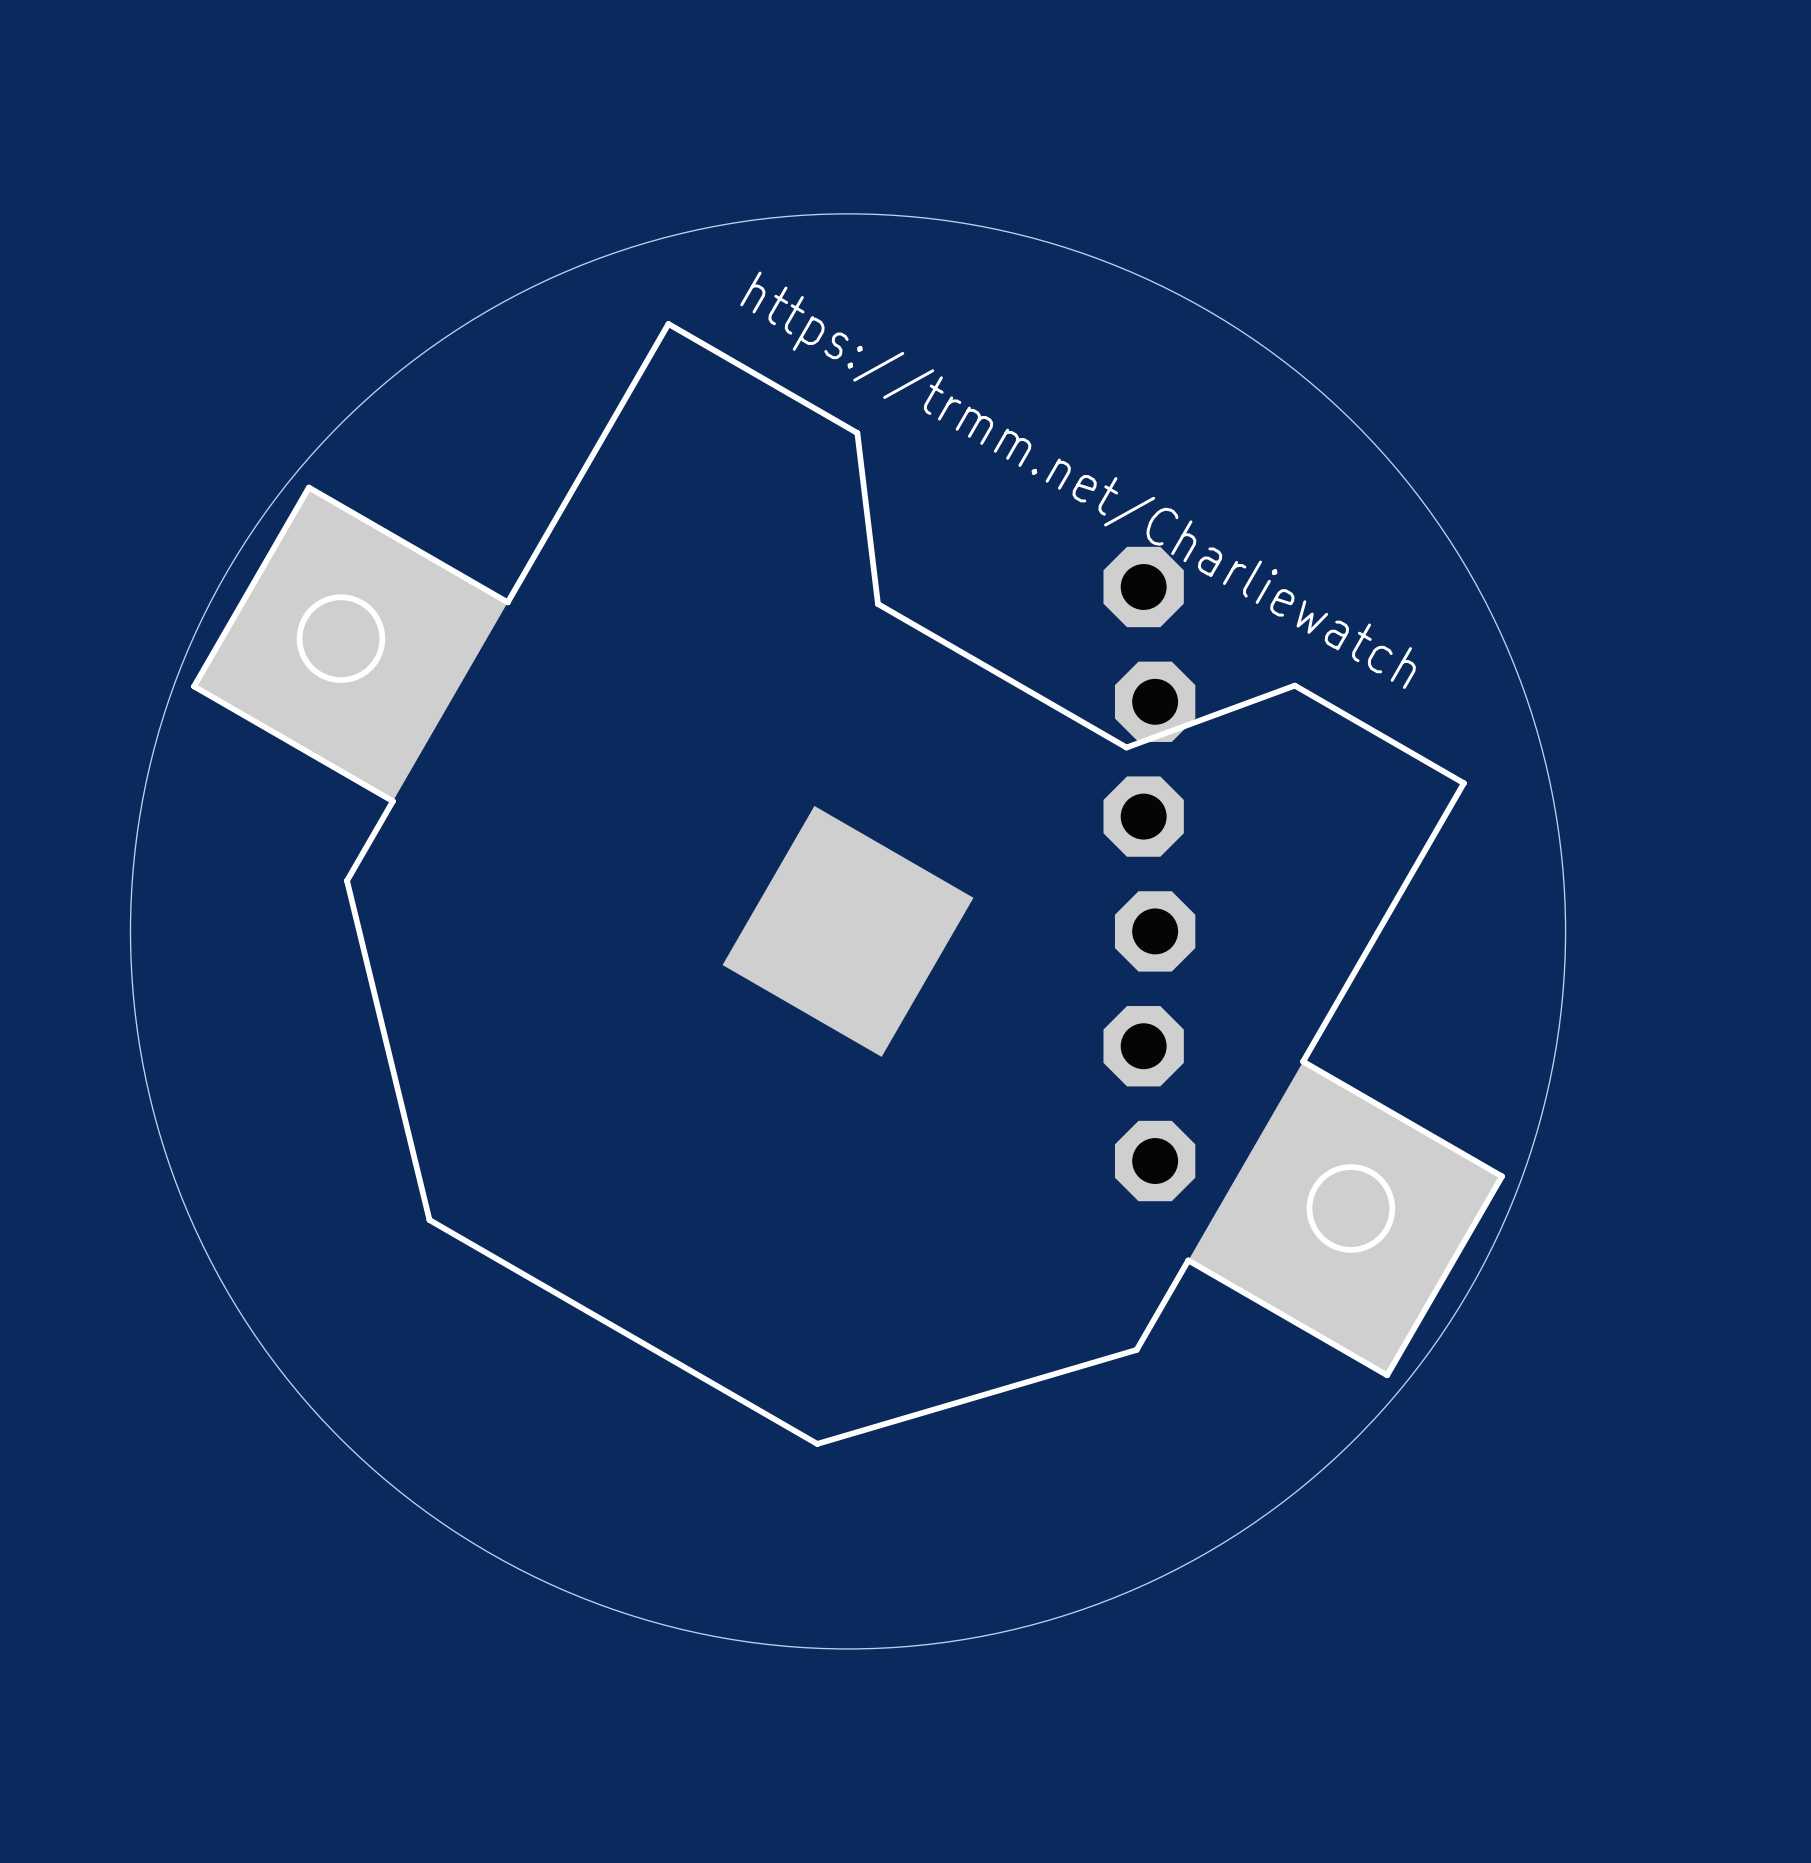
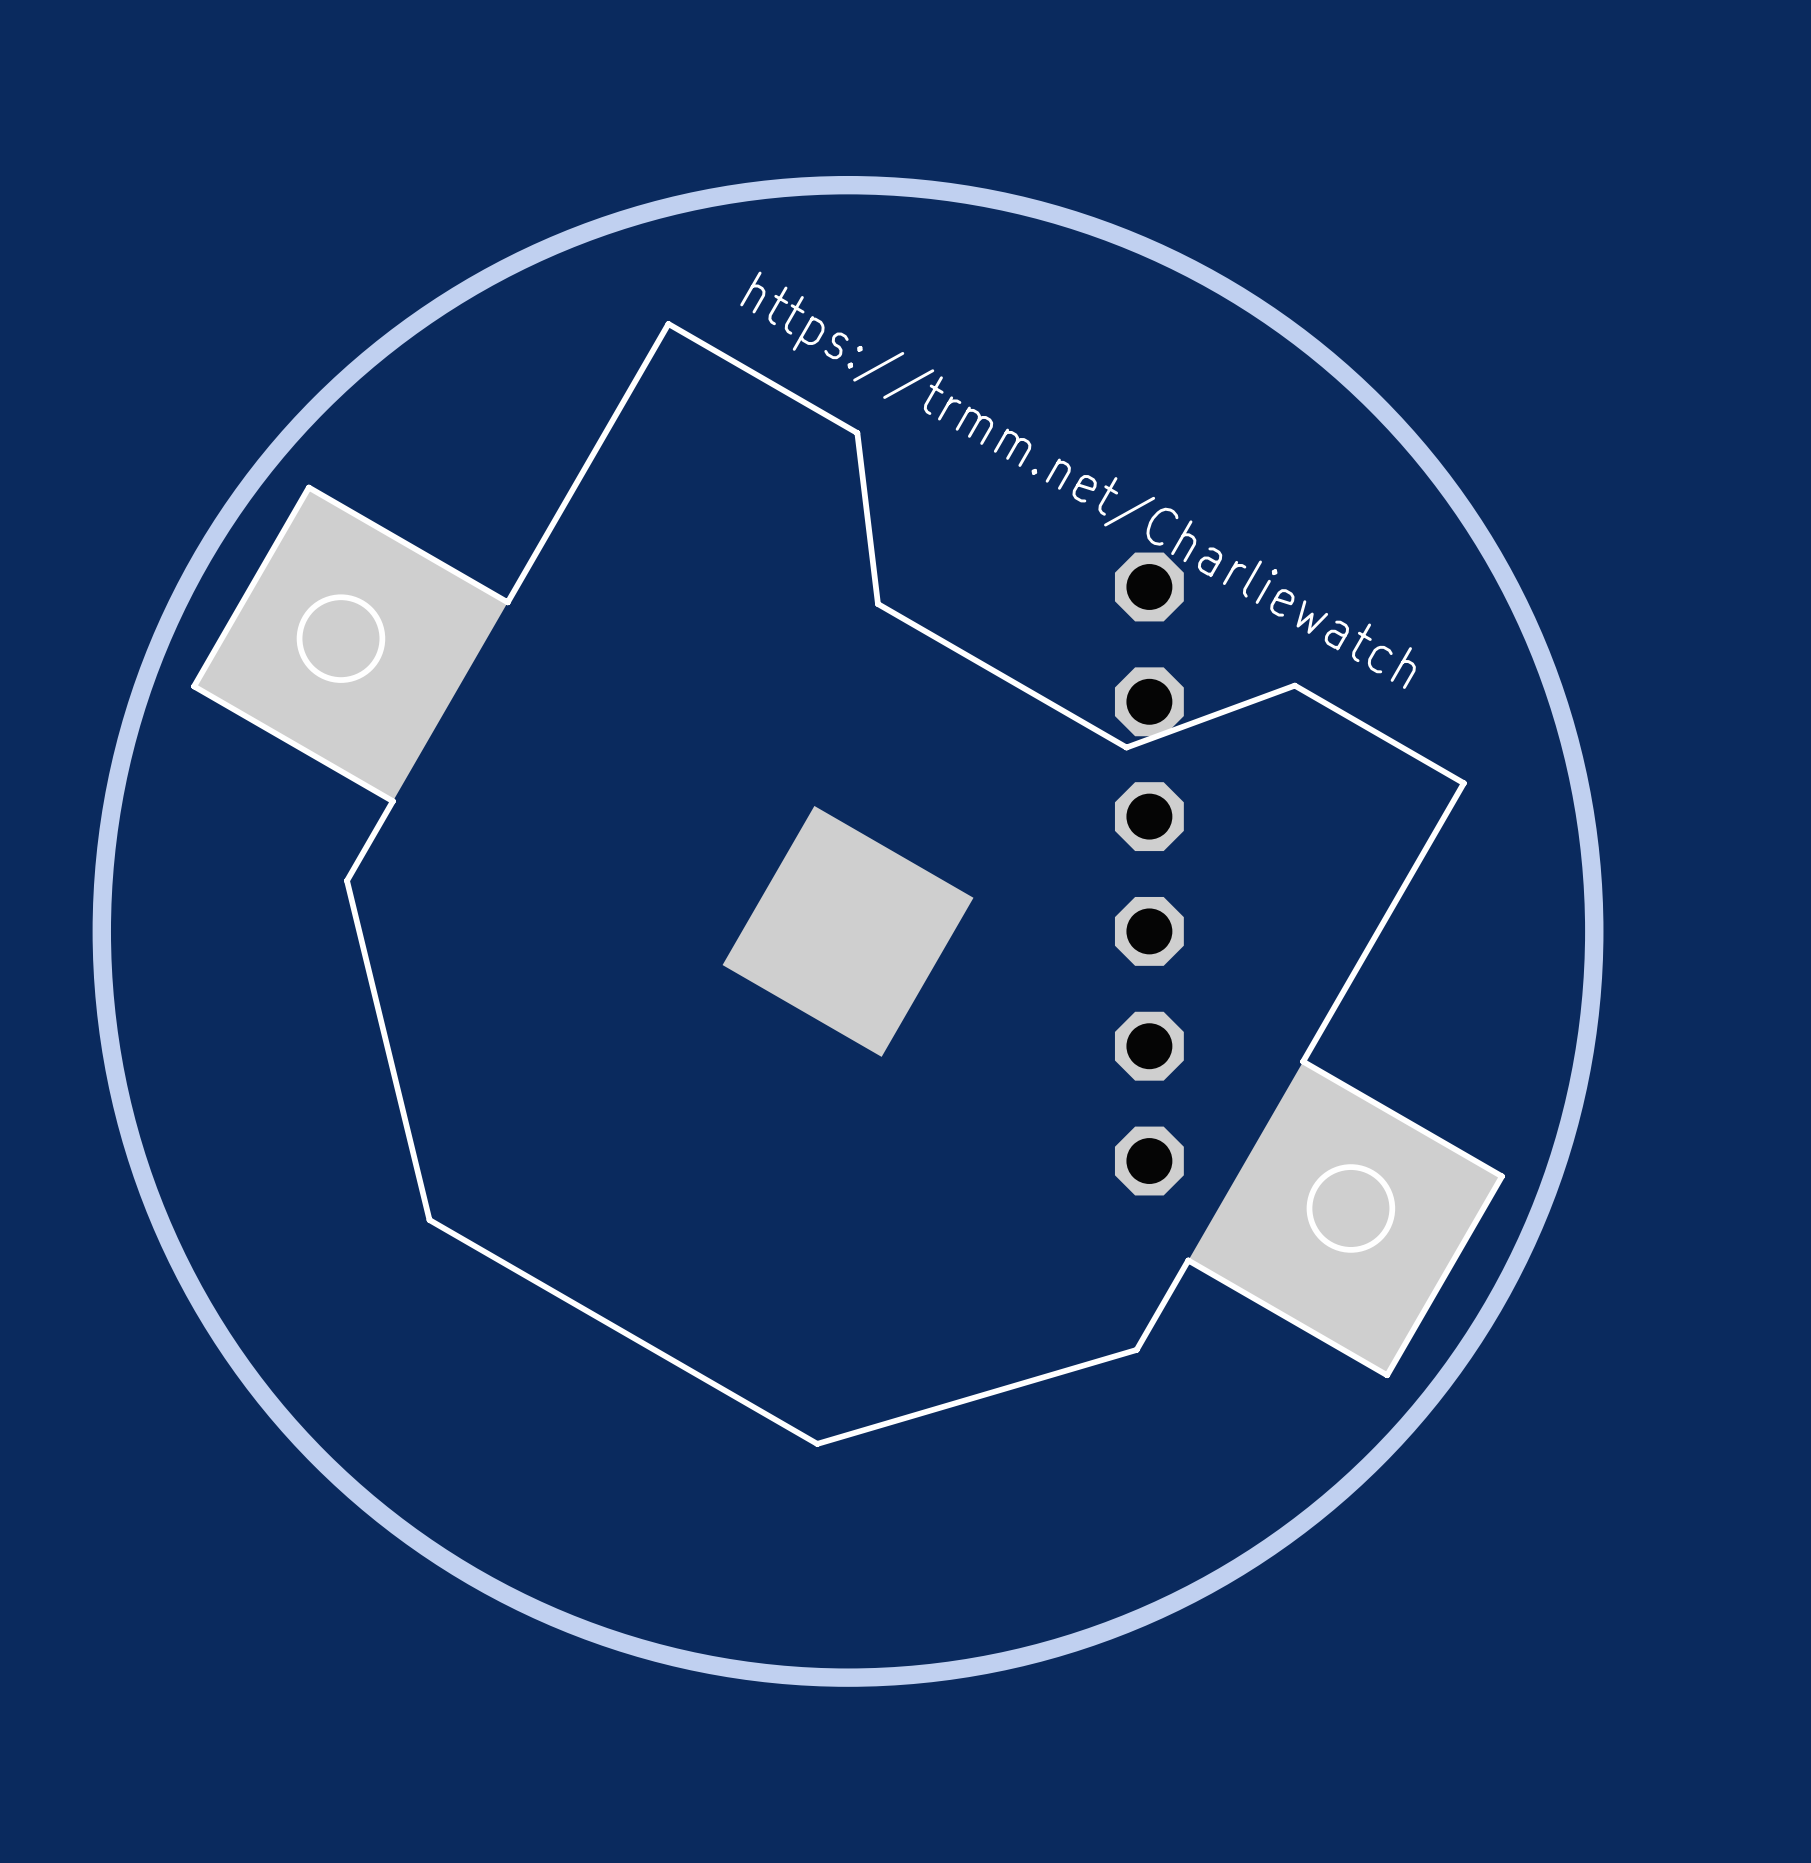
round board edge size: [129, 213, 1567, 1650] -> [92, 175, 1604, 1687]
part footprint: [1103, 546, 1196, 1202] -> [1114, 552, 1184, 1196]

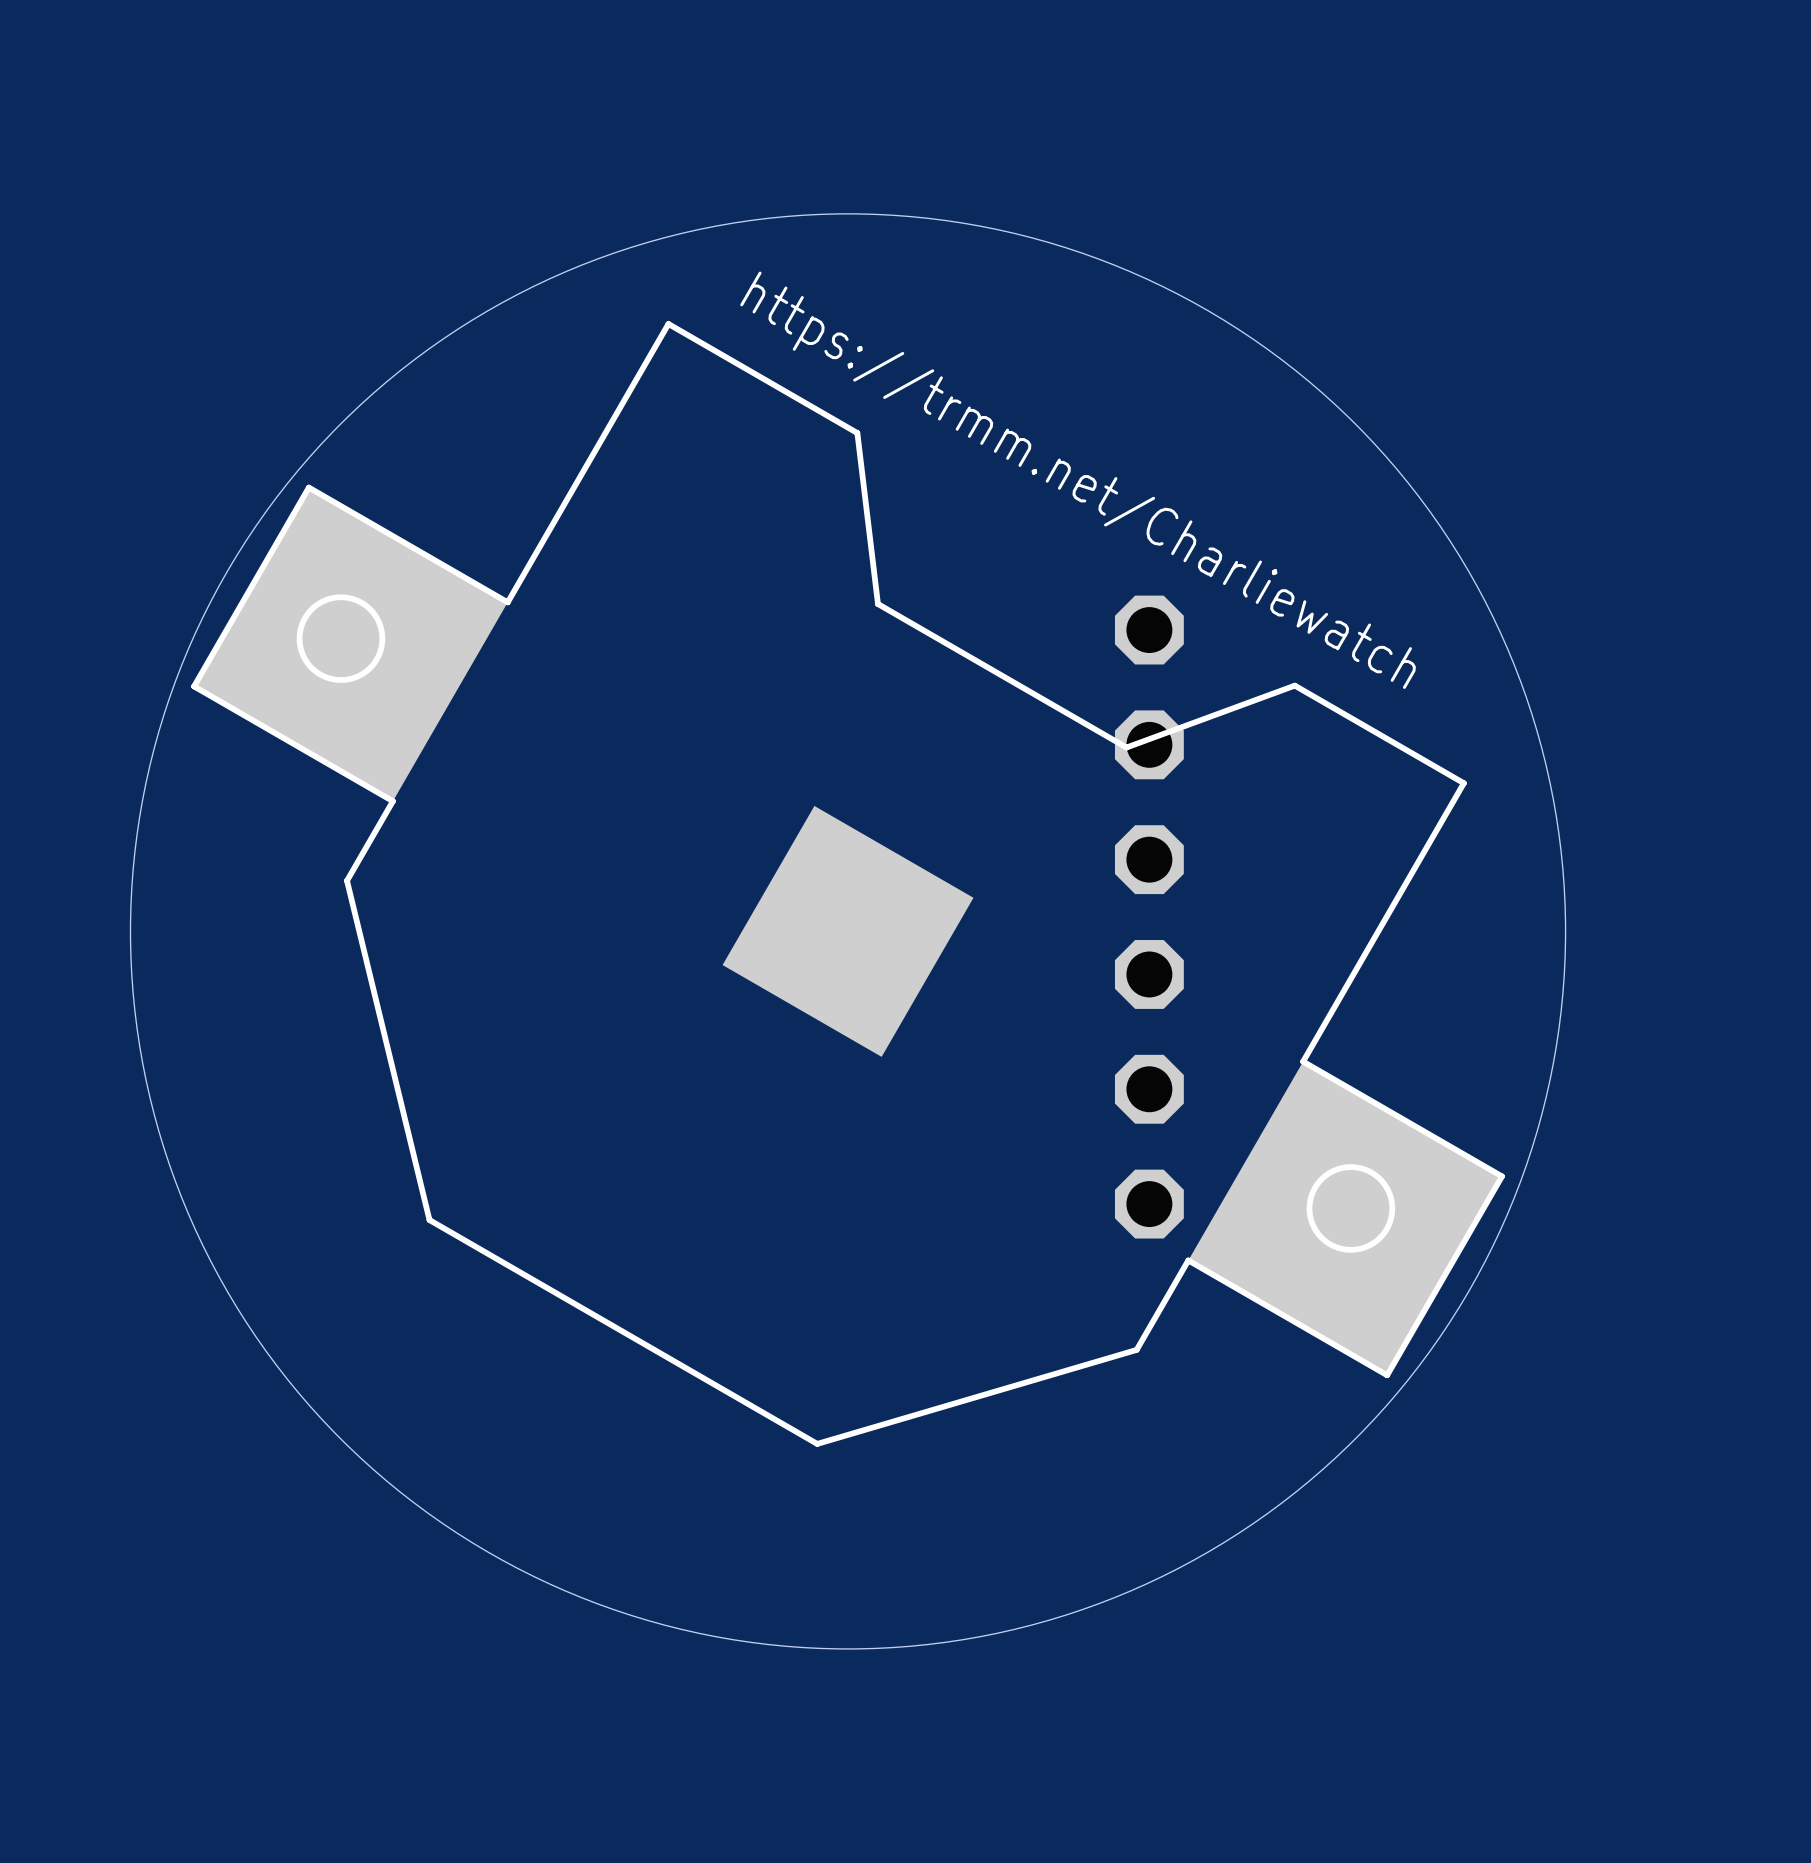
round board edge size: [92, 175, 1604, 1687] -> [129, 213, 1567, 1650]
part position: (1149, 874) -> (1149, 917)

